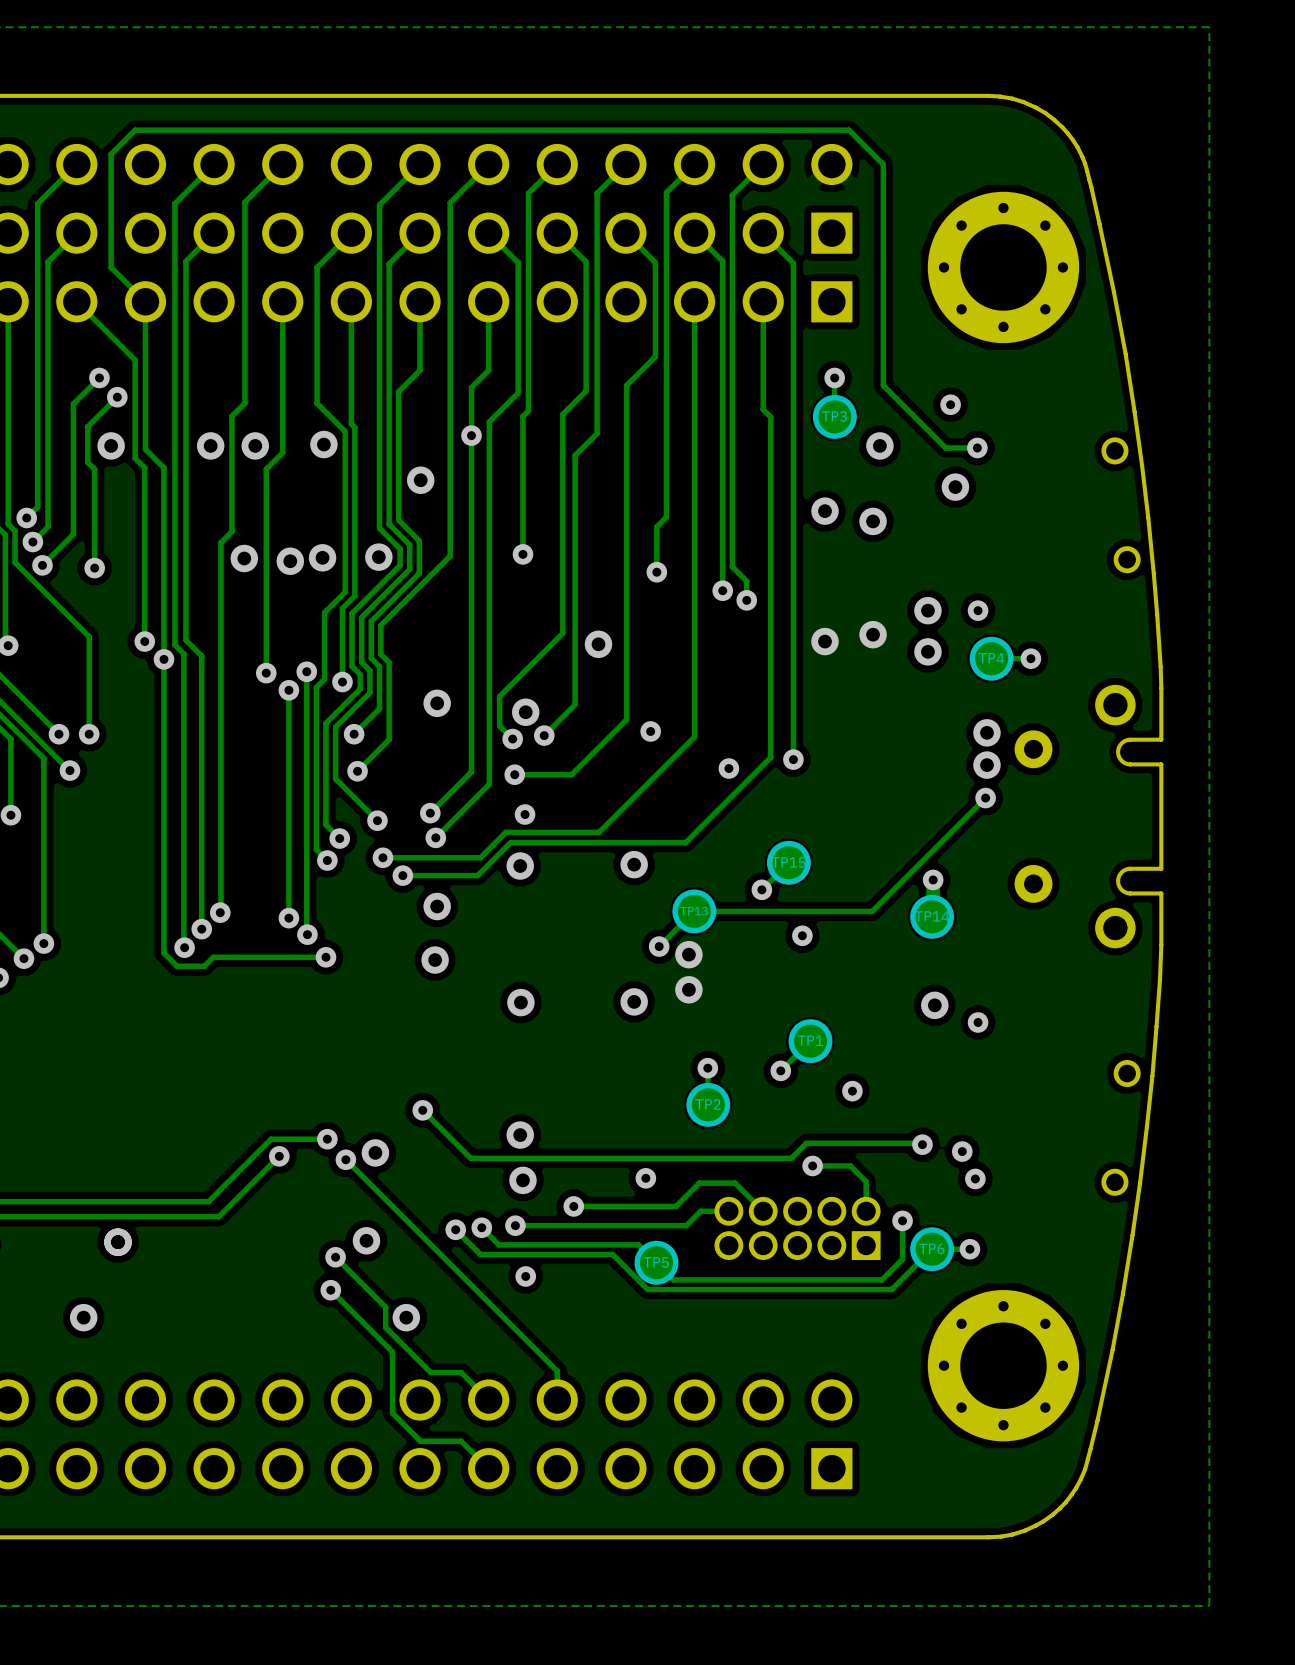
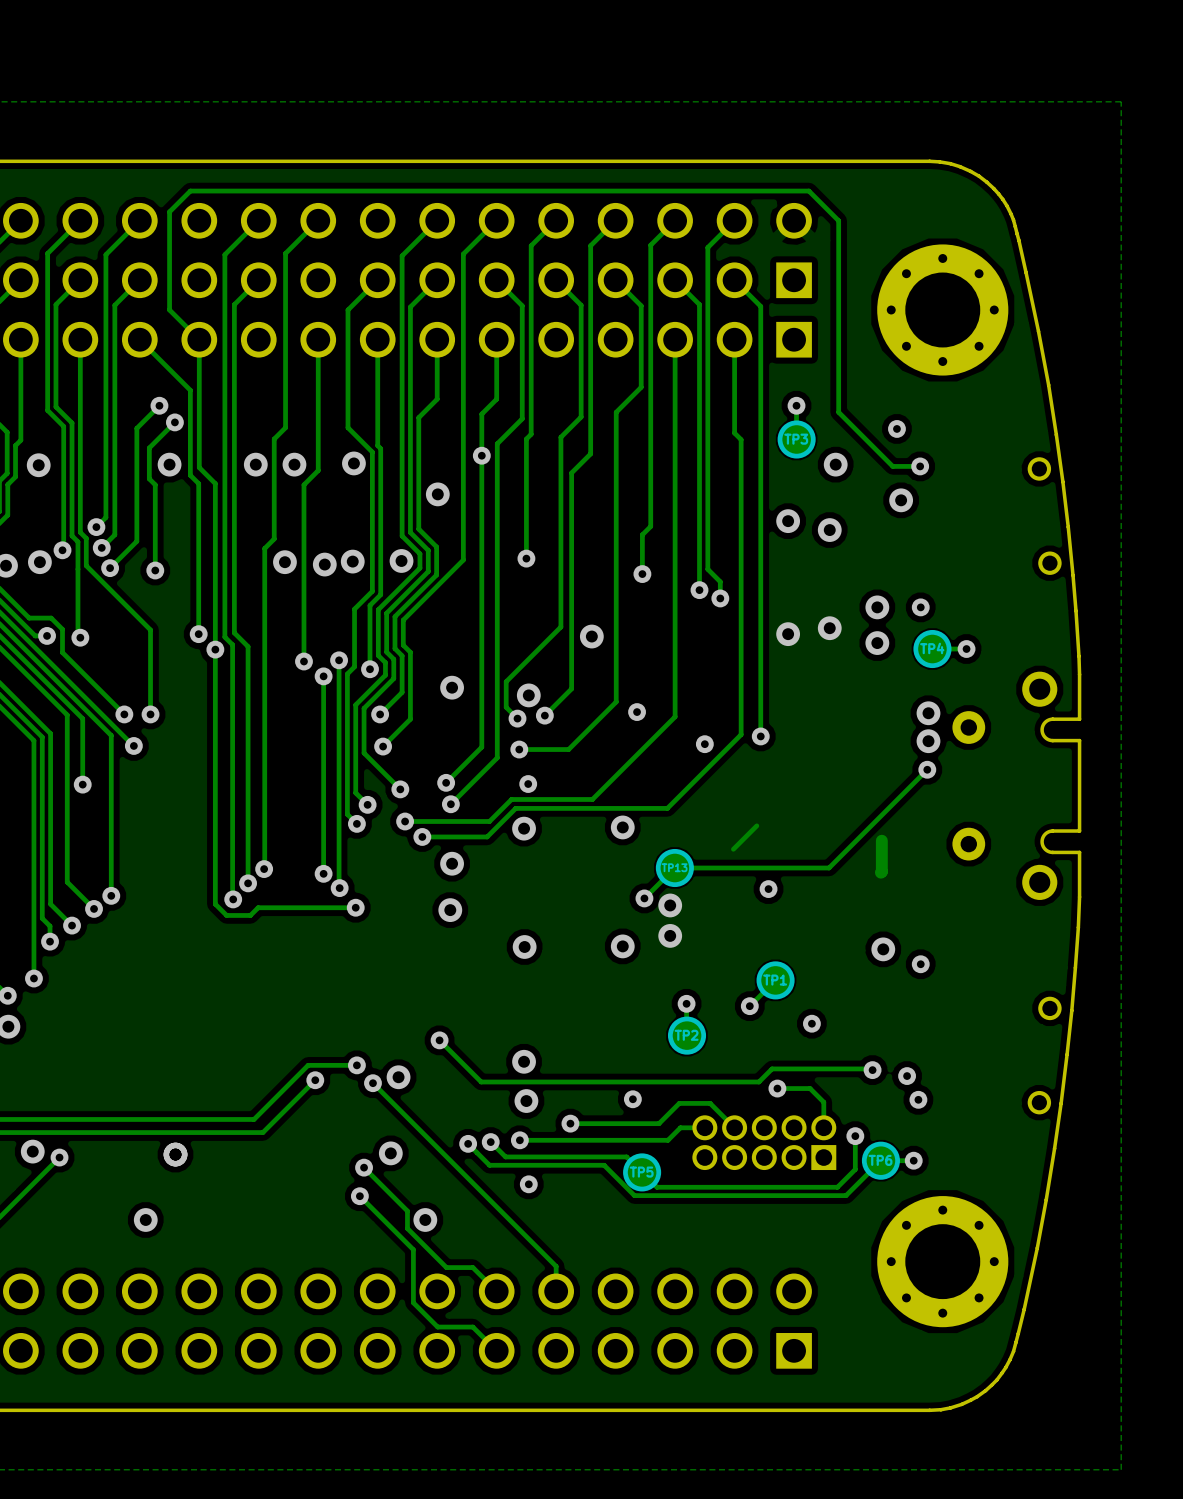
TP15: (788, 862) -> none
via: (933, 879) -> none
via: (761, 889) -> none
TP14: (932, 916) -> none

